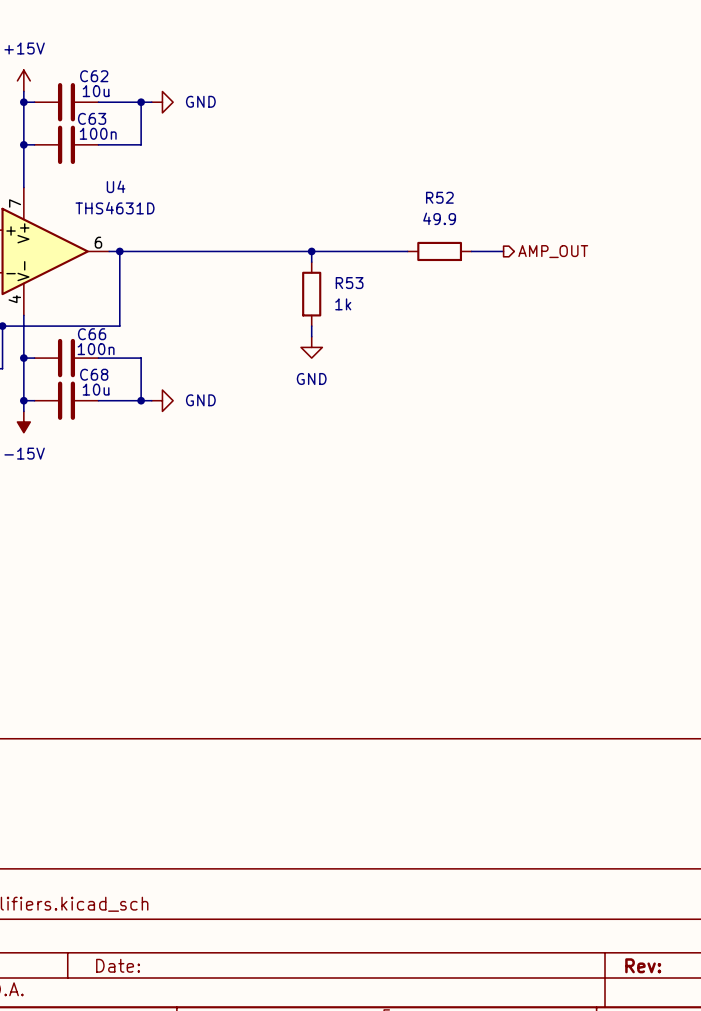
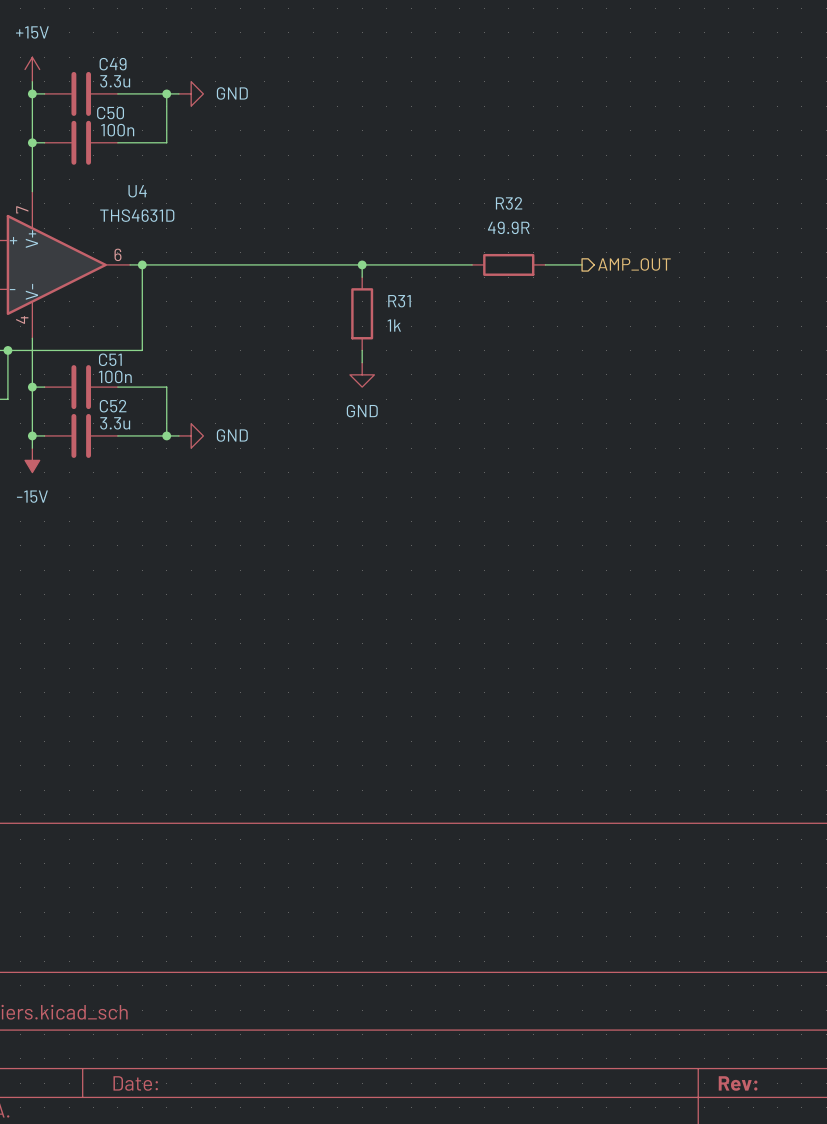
C62 name: C62 (94, 76) -> C49 (113, 64)
C62 value: 10u (96, 91) -> 3.3u (115, 81)
C63 name: C63 (92, 118) -> C50 (110, 113)
R52 name: R52 (439, 197) -> R32 (509, 203)
R52 value: 49.9 (439, 218) -> 49.9R (508, 227)
R53 name: R53 (349, 283) -> R31 (399, 301)
C66 name: C66 (92, 334) -> C51 (110, 359)
C68 name: C68 (94, 374) -> C52 (113, 406)
C68 value: 10u (96, 389) -> 3.3u (115, 423)

